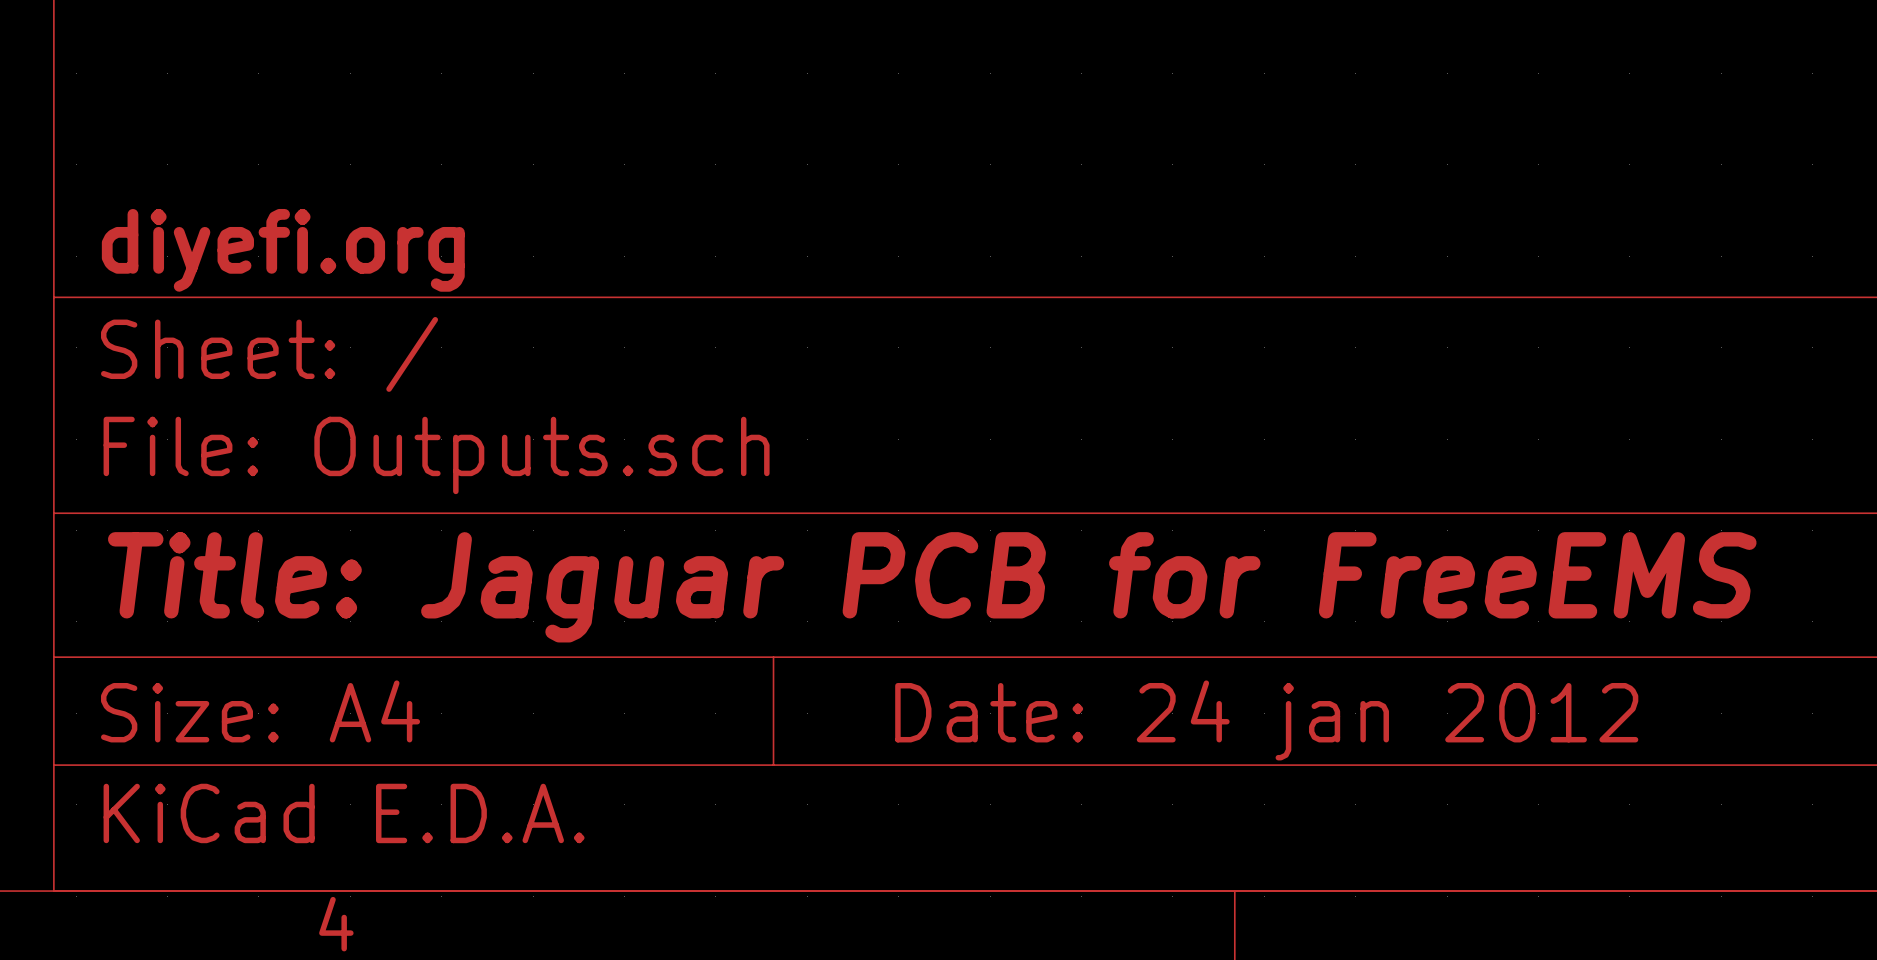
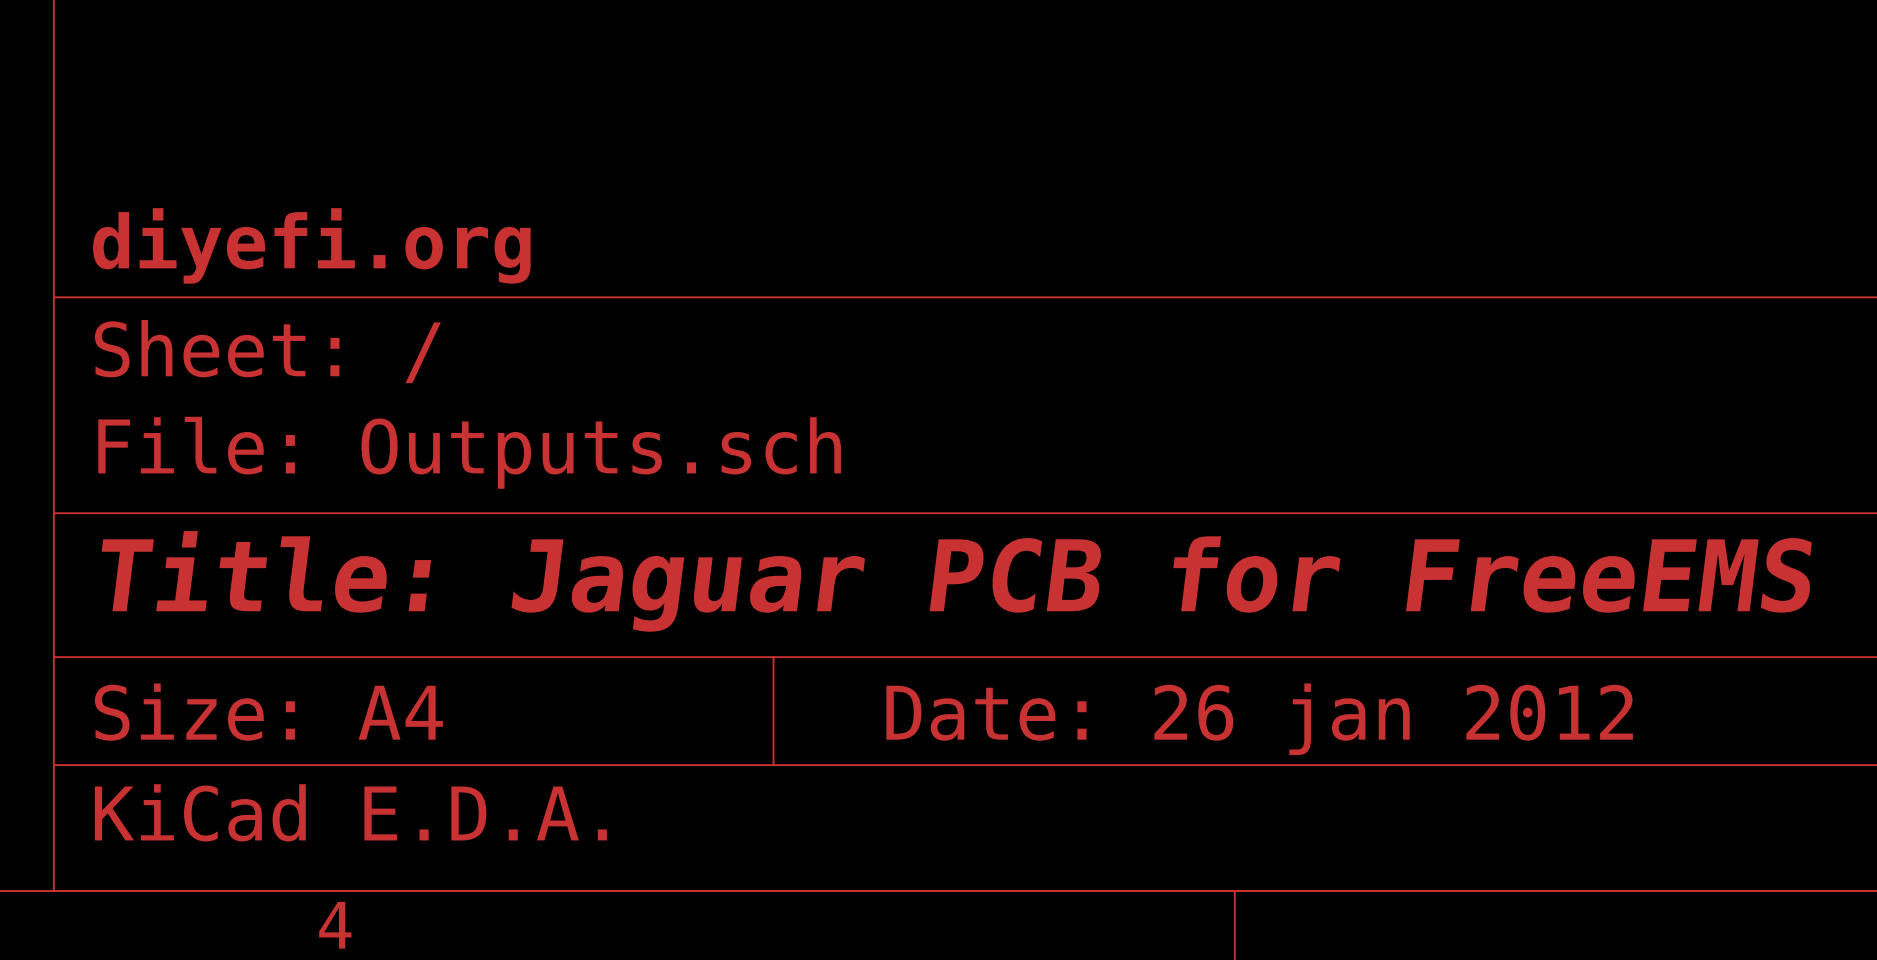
title block: Date: 24 jan 2012 (1266, 720) -> Date: 26 jan 2012 (1259, 719)

